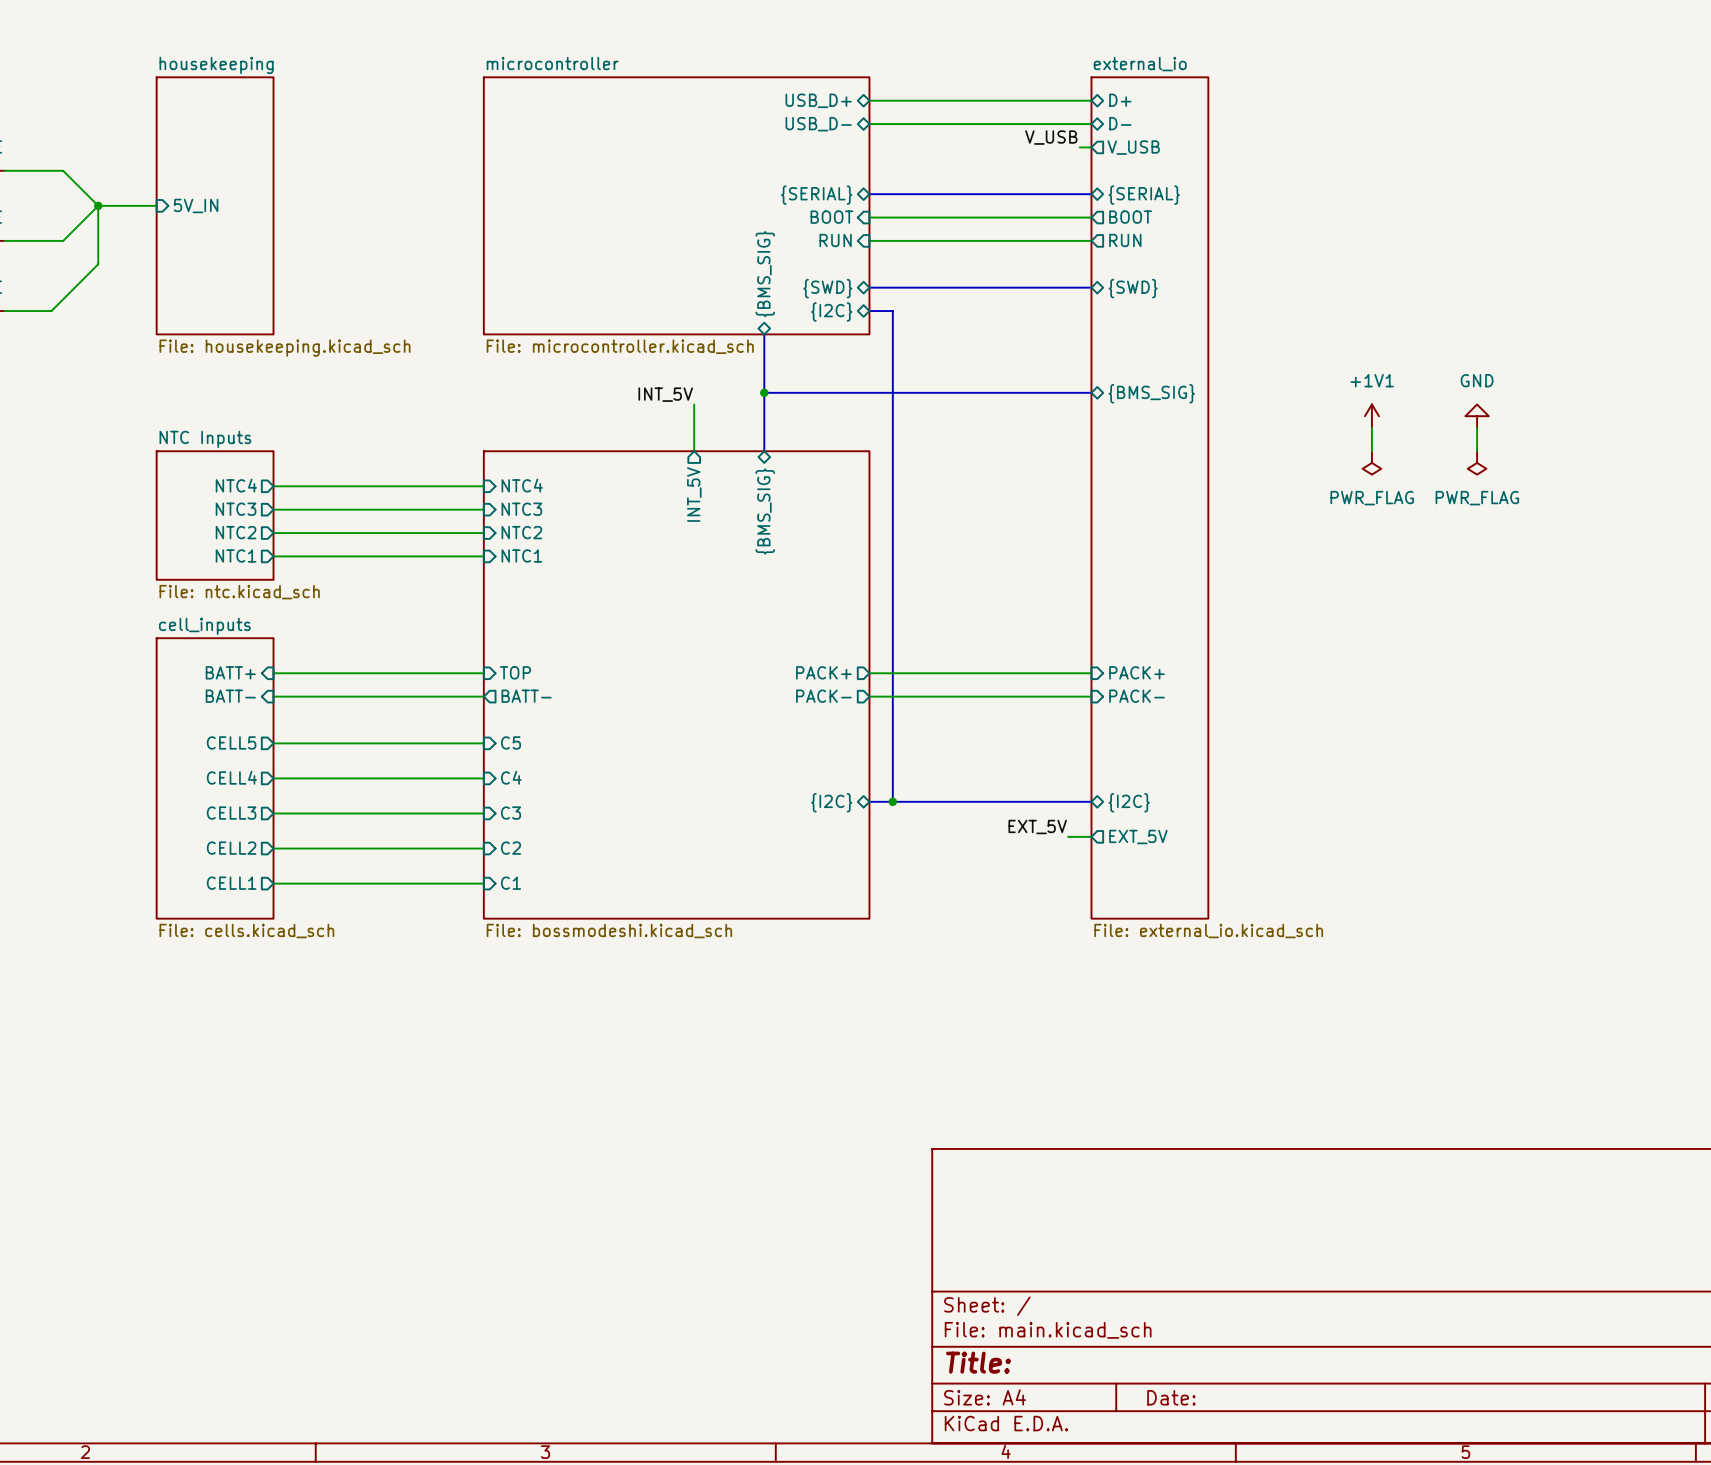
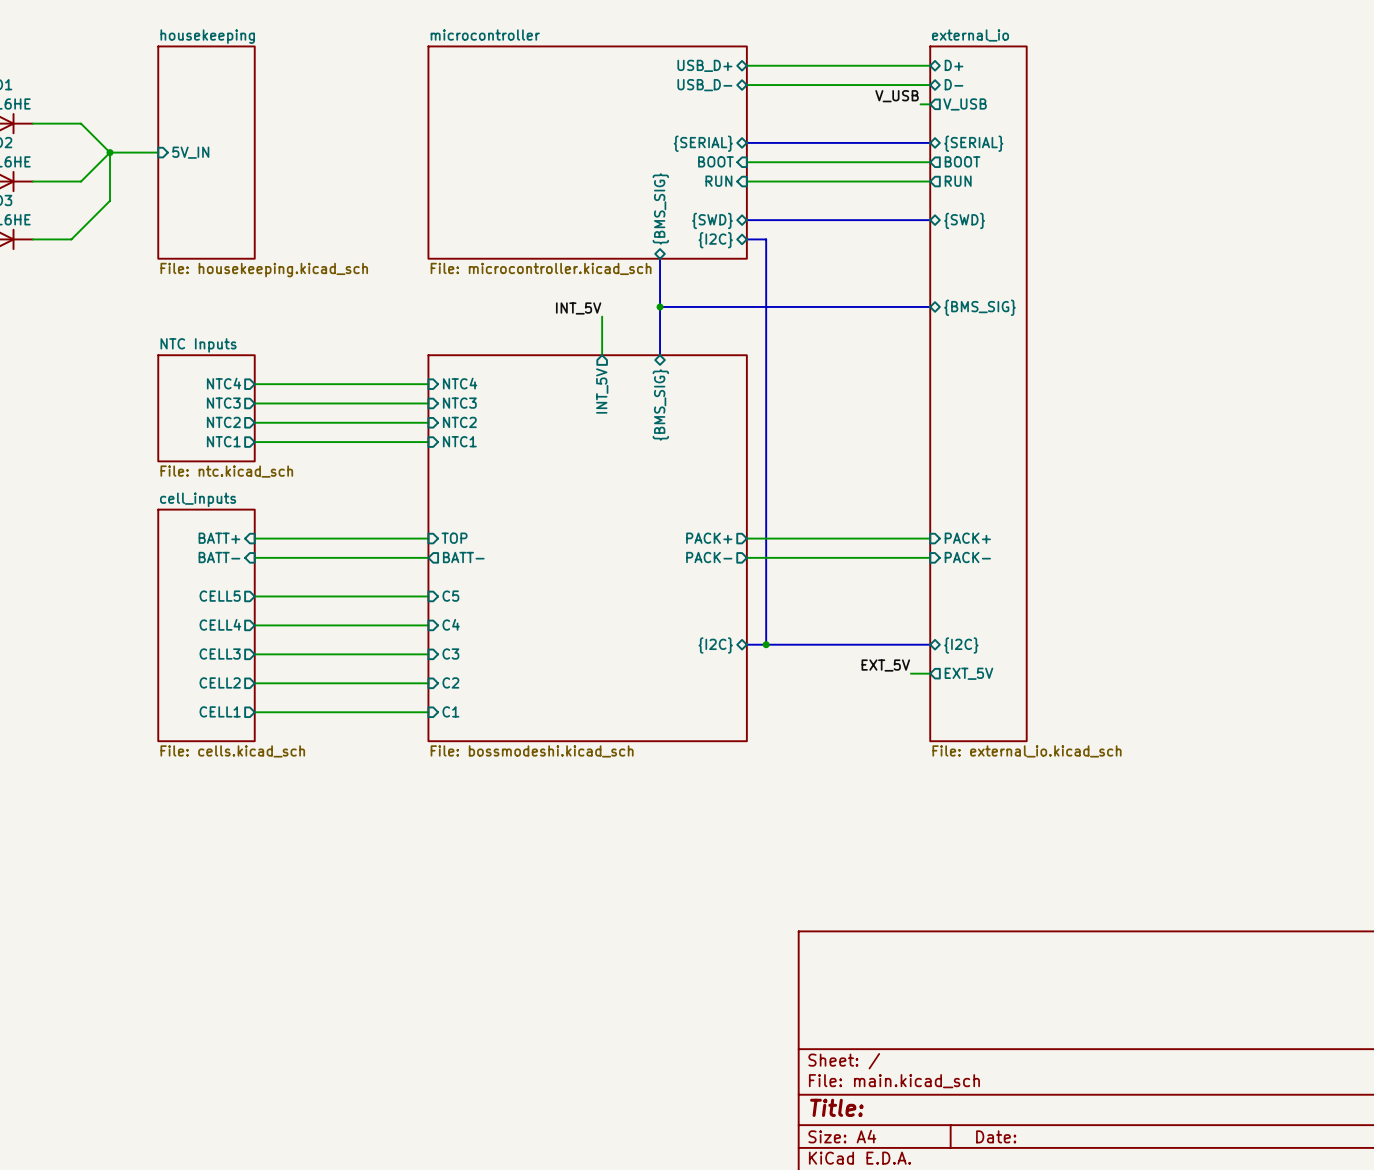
power symbol: +1V1 (1371, 416) -> none
power symbol: GND (1477, 416) -> none
wire: (1371, 427) (1371, 451) -> none
wire: (1477, 427) (1477, 451) -> none
power symbol: PWR_FLAG (1371, 462) -> none
power symbol: PWR_FLAG (1477, 462) -> none

